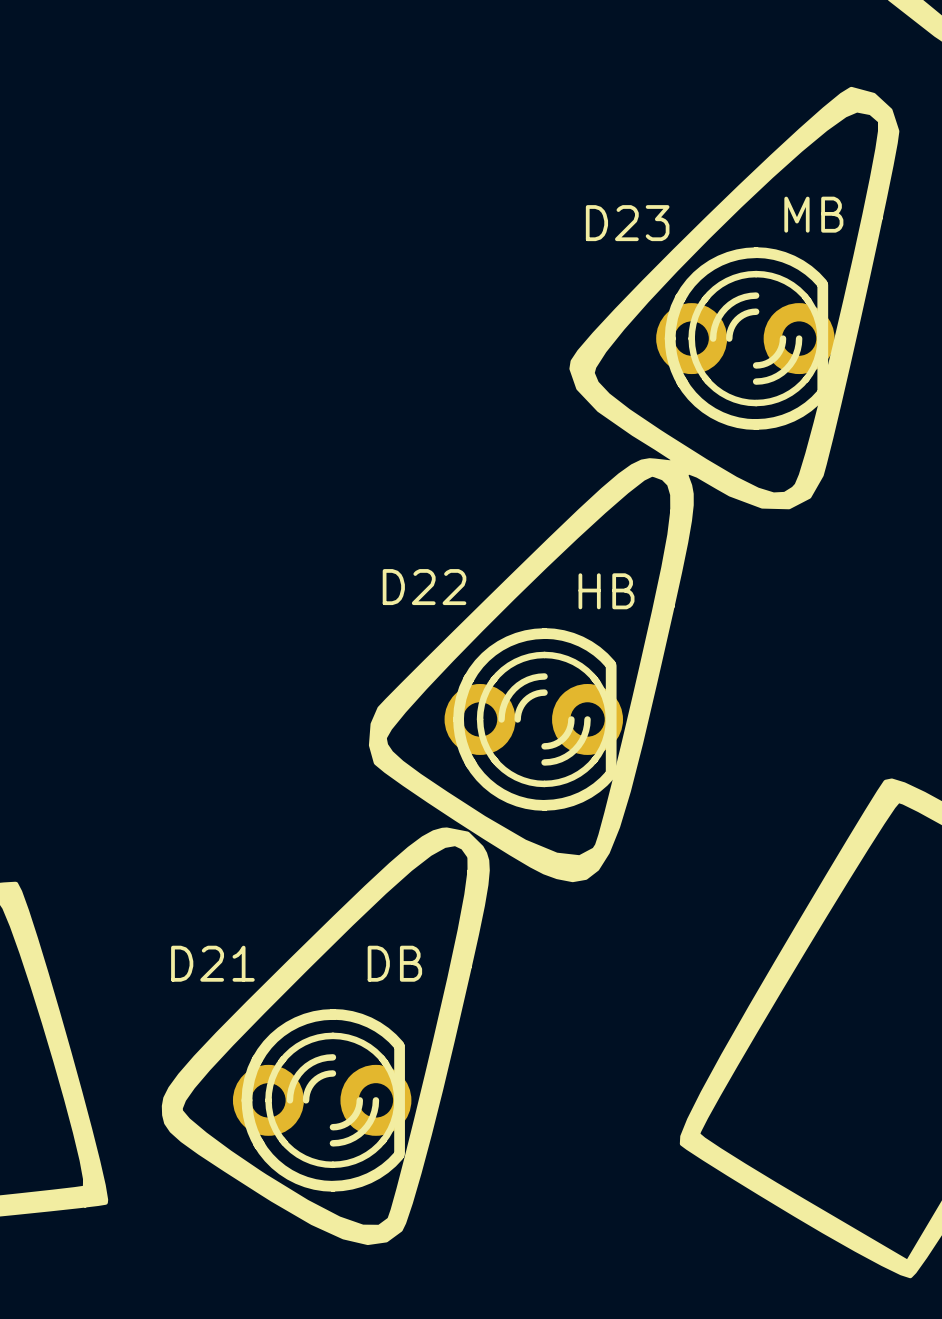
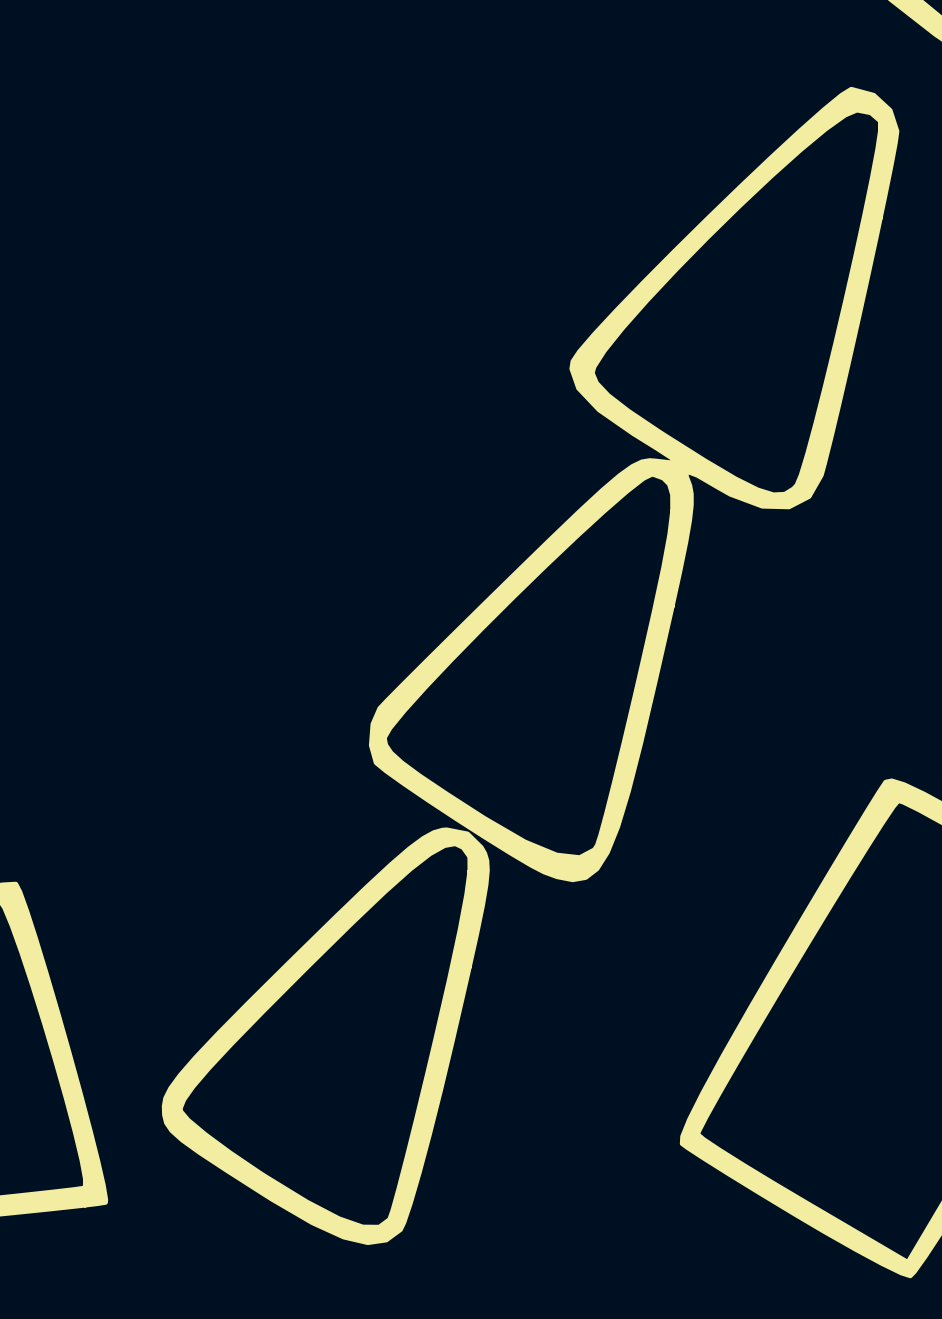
D23: MB (745, 338) -> none
D22: HB (533, 719) -> none
D21: DB (322, 1100) -> none

